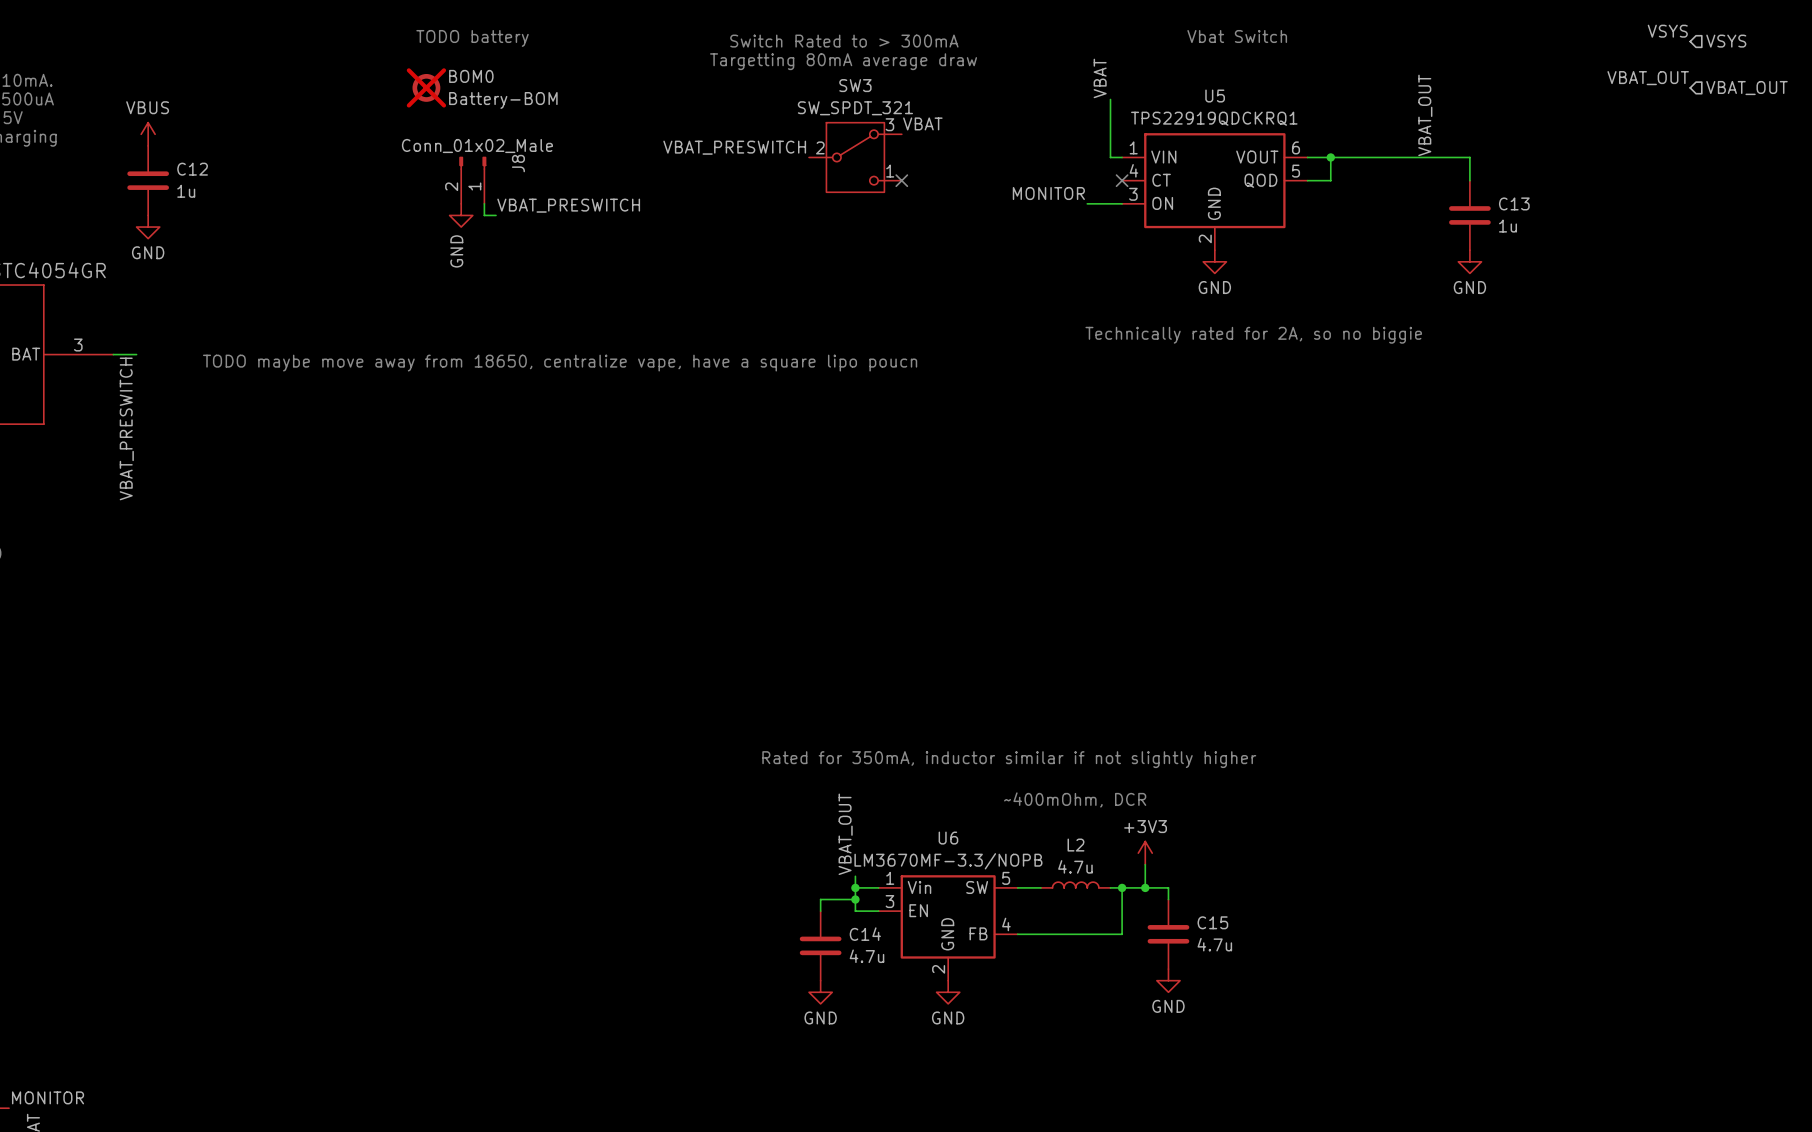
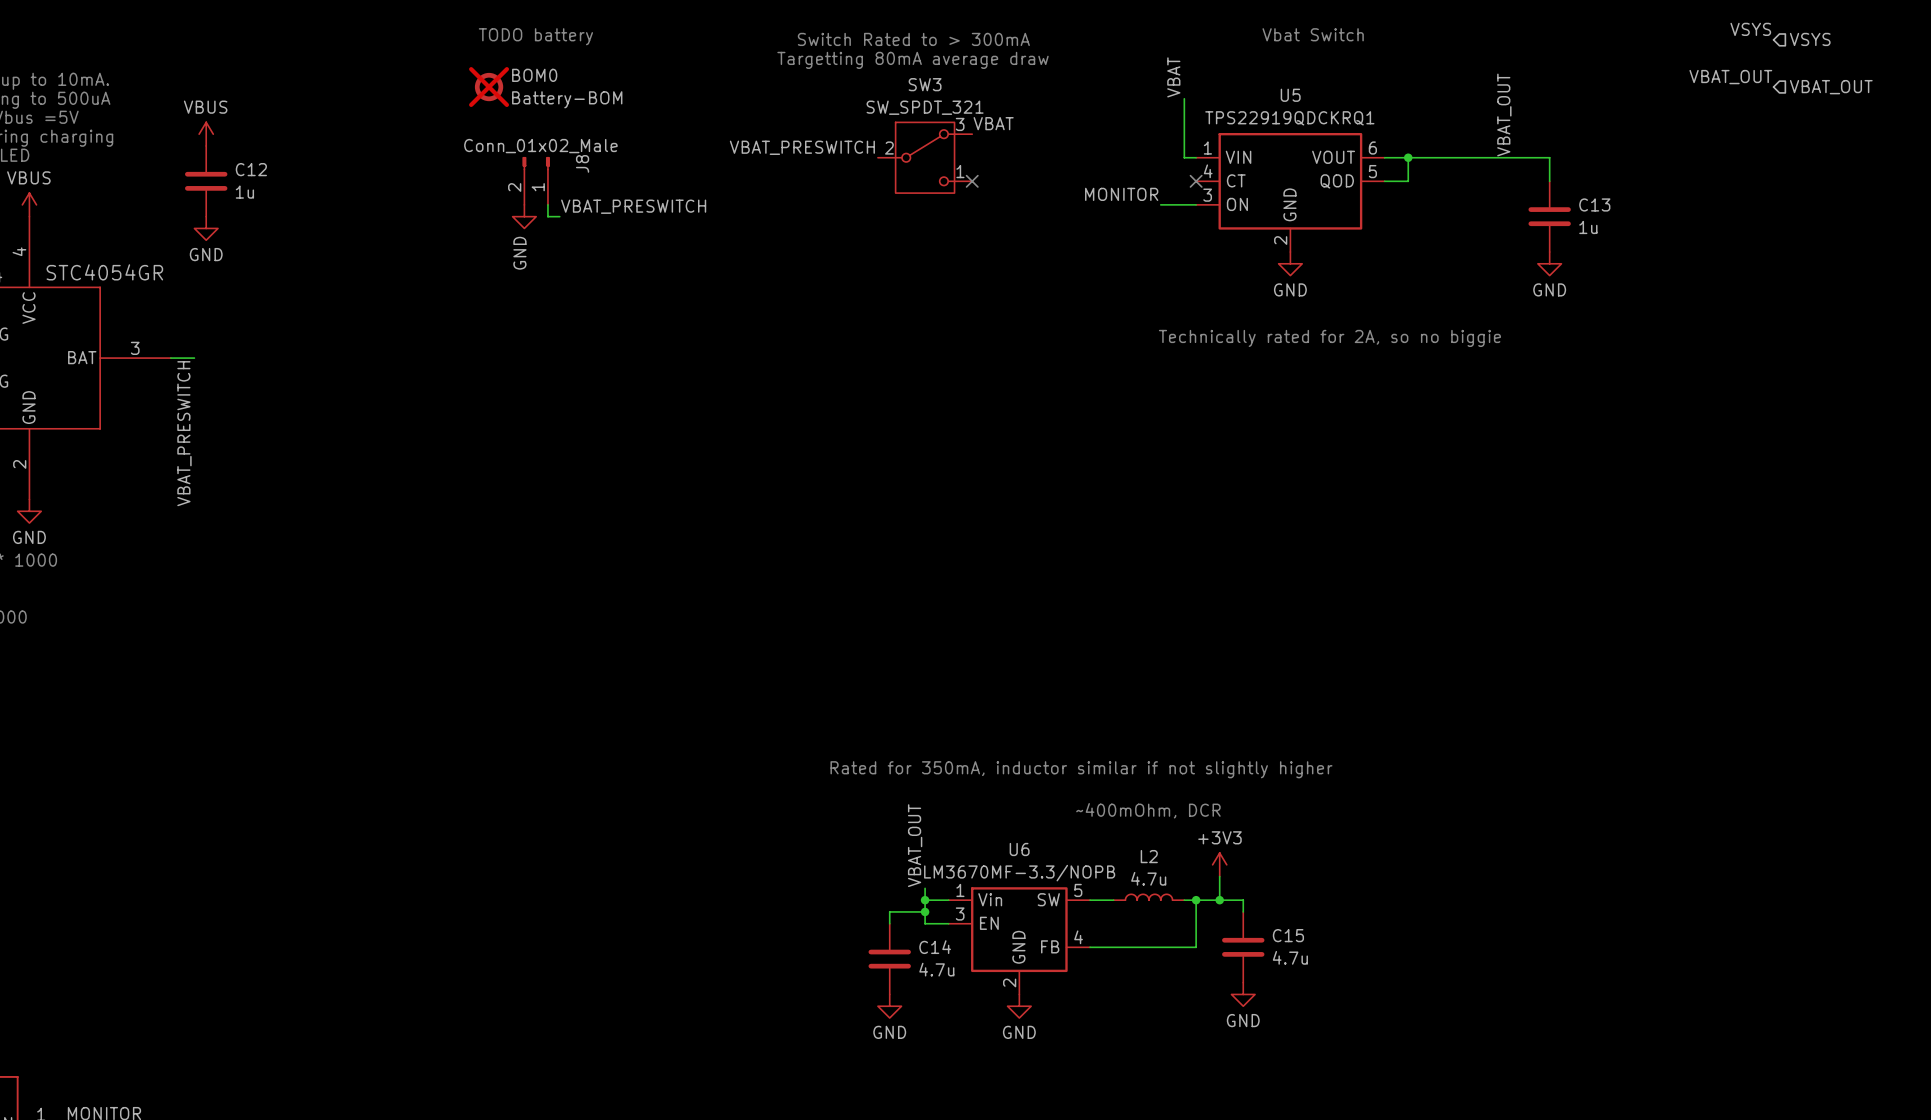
text: TODO maybe move away from 18650, centralize vape, have a square lipo poucn (560, 363) -> none

